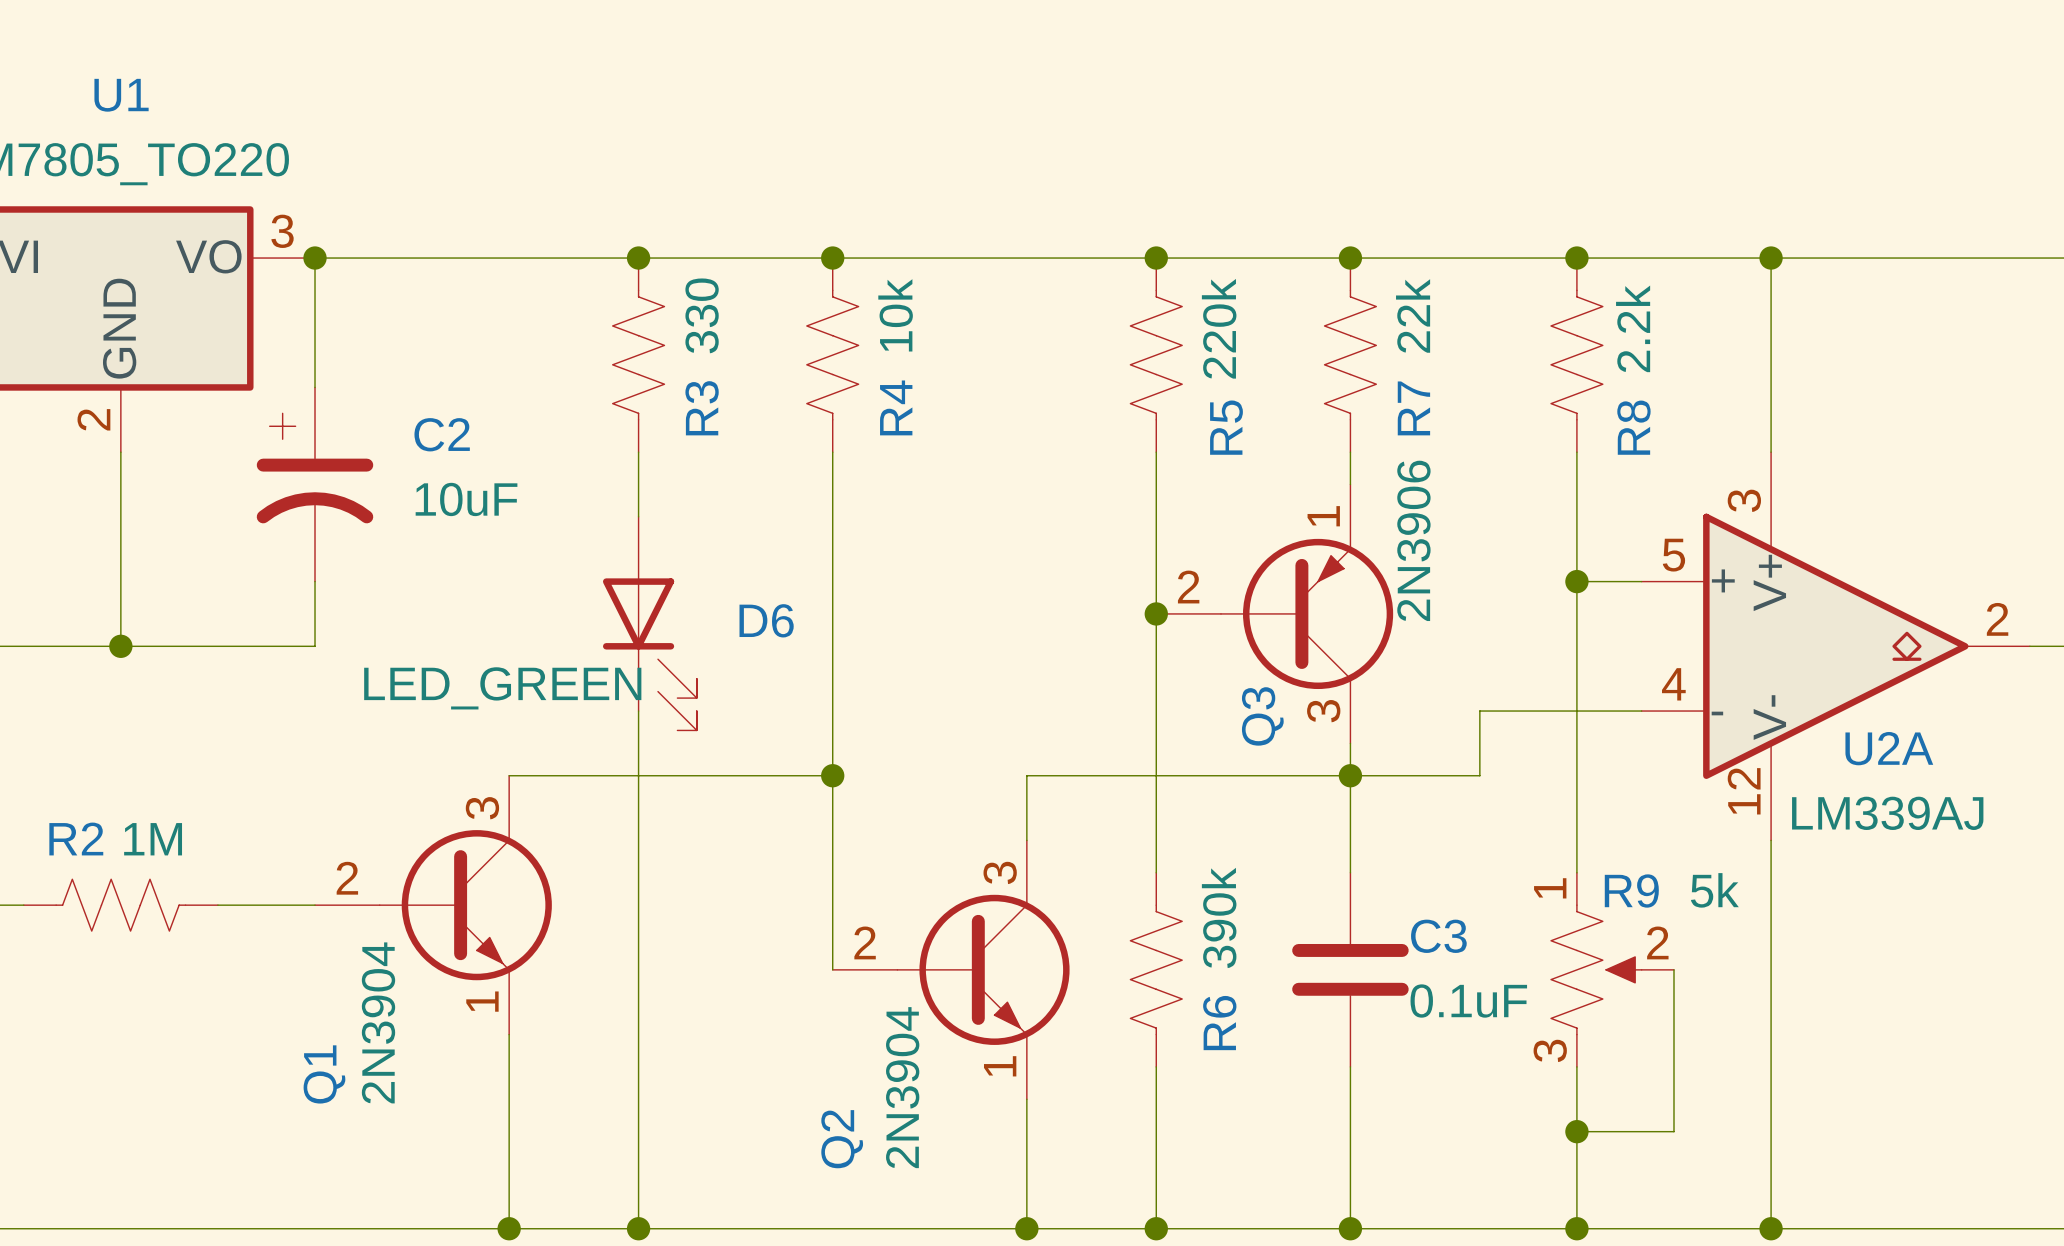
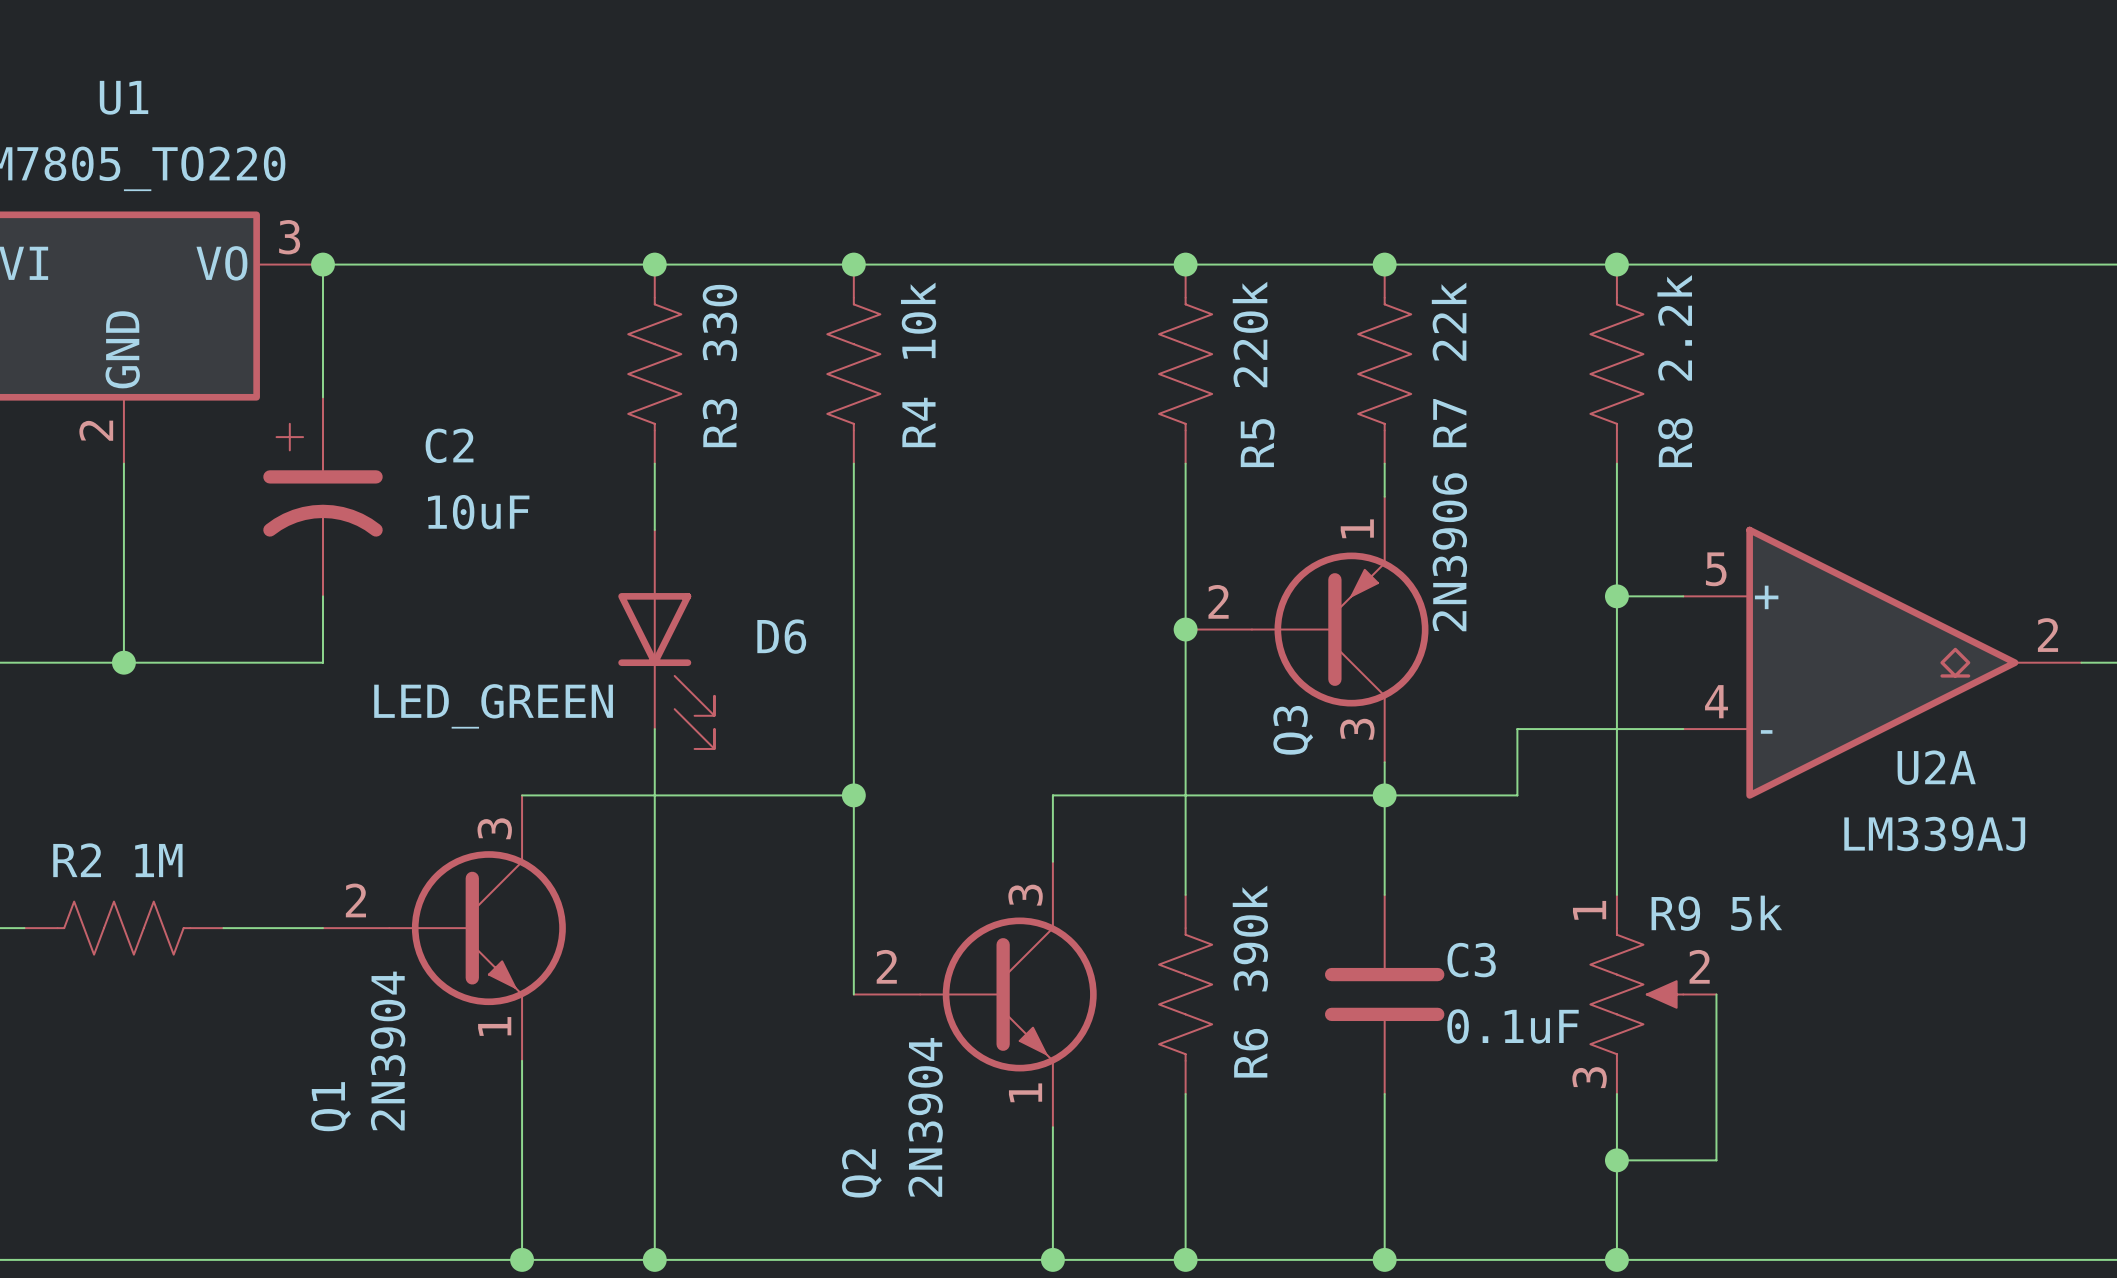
wire: (1771, 258) (1771, 452) -> none
junction: (1771, 258) -> none
part: (1771, 646) -> none
wire: (1771, 840) (1771, 1228) -> none
junction: (1771, 1228) -> none

